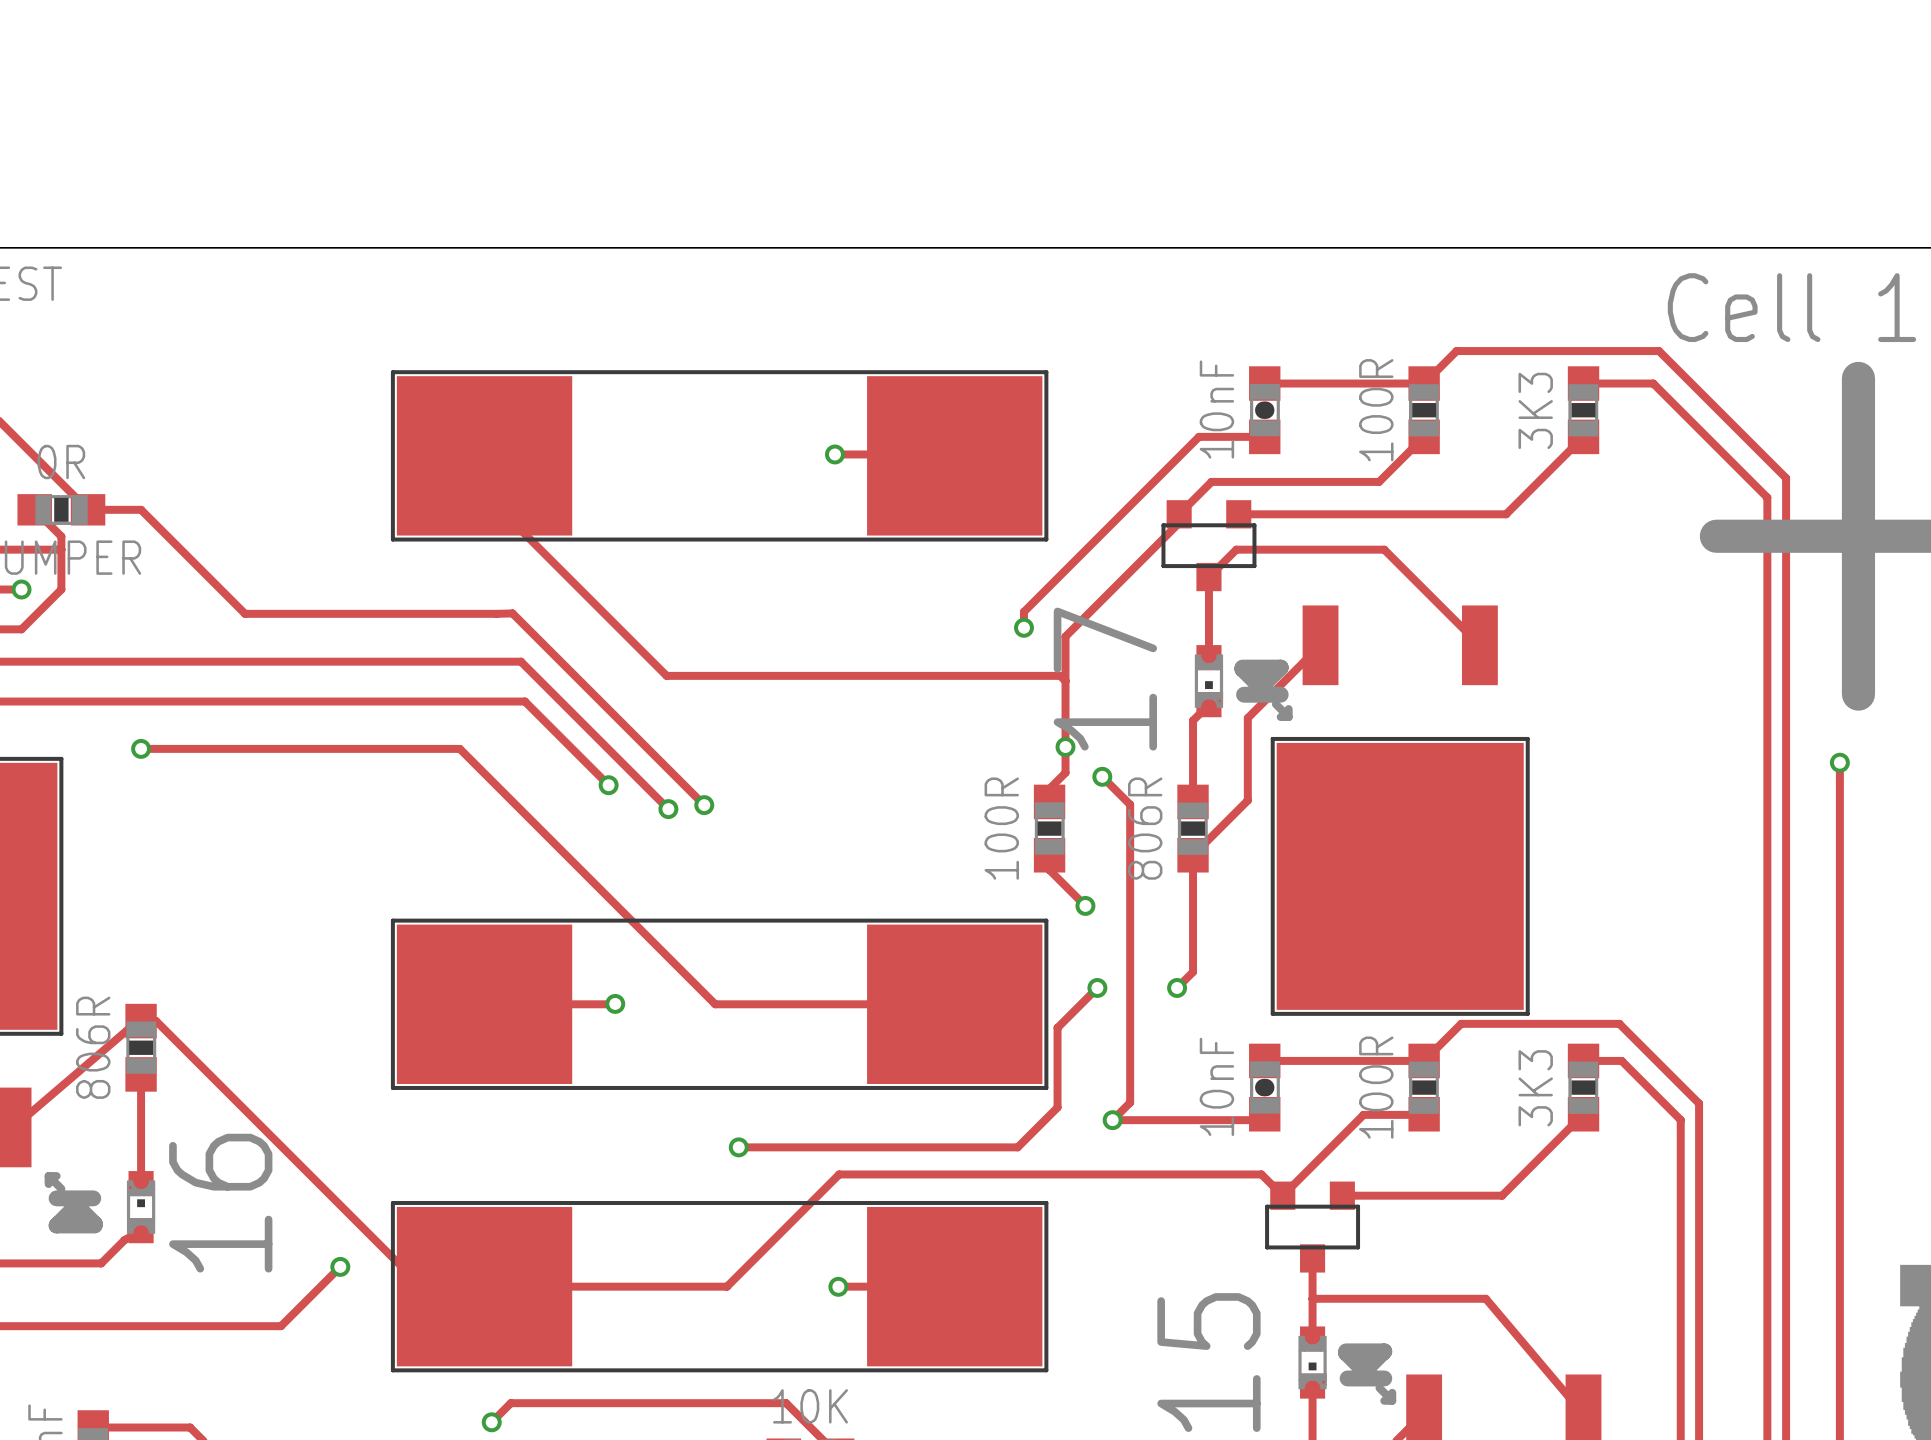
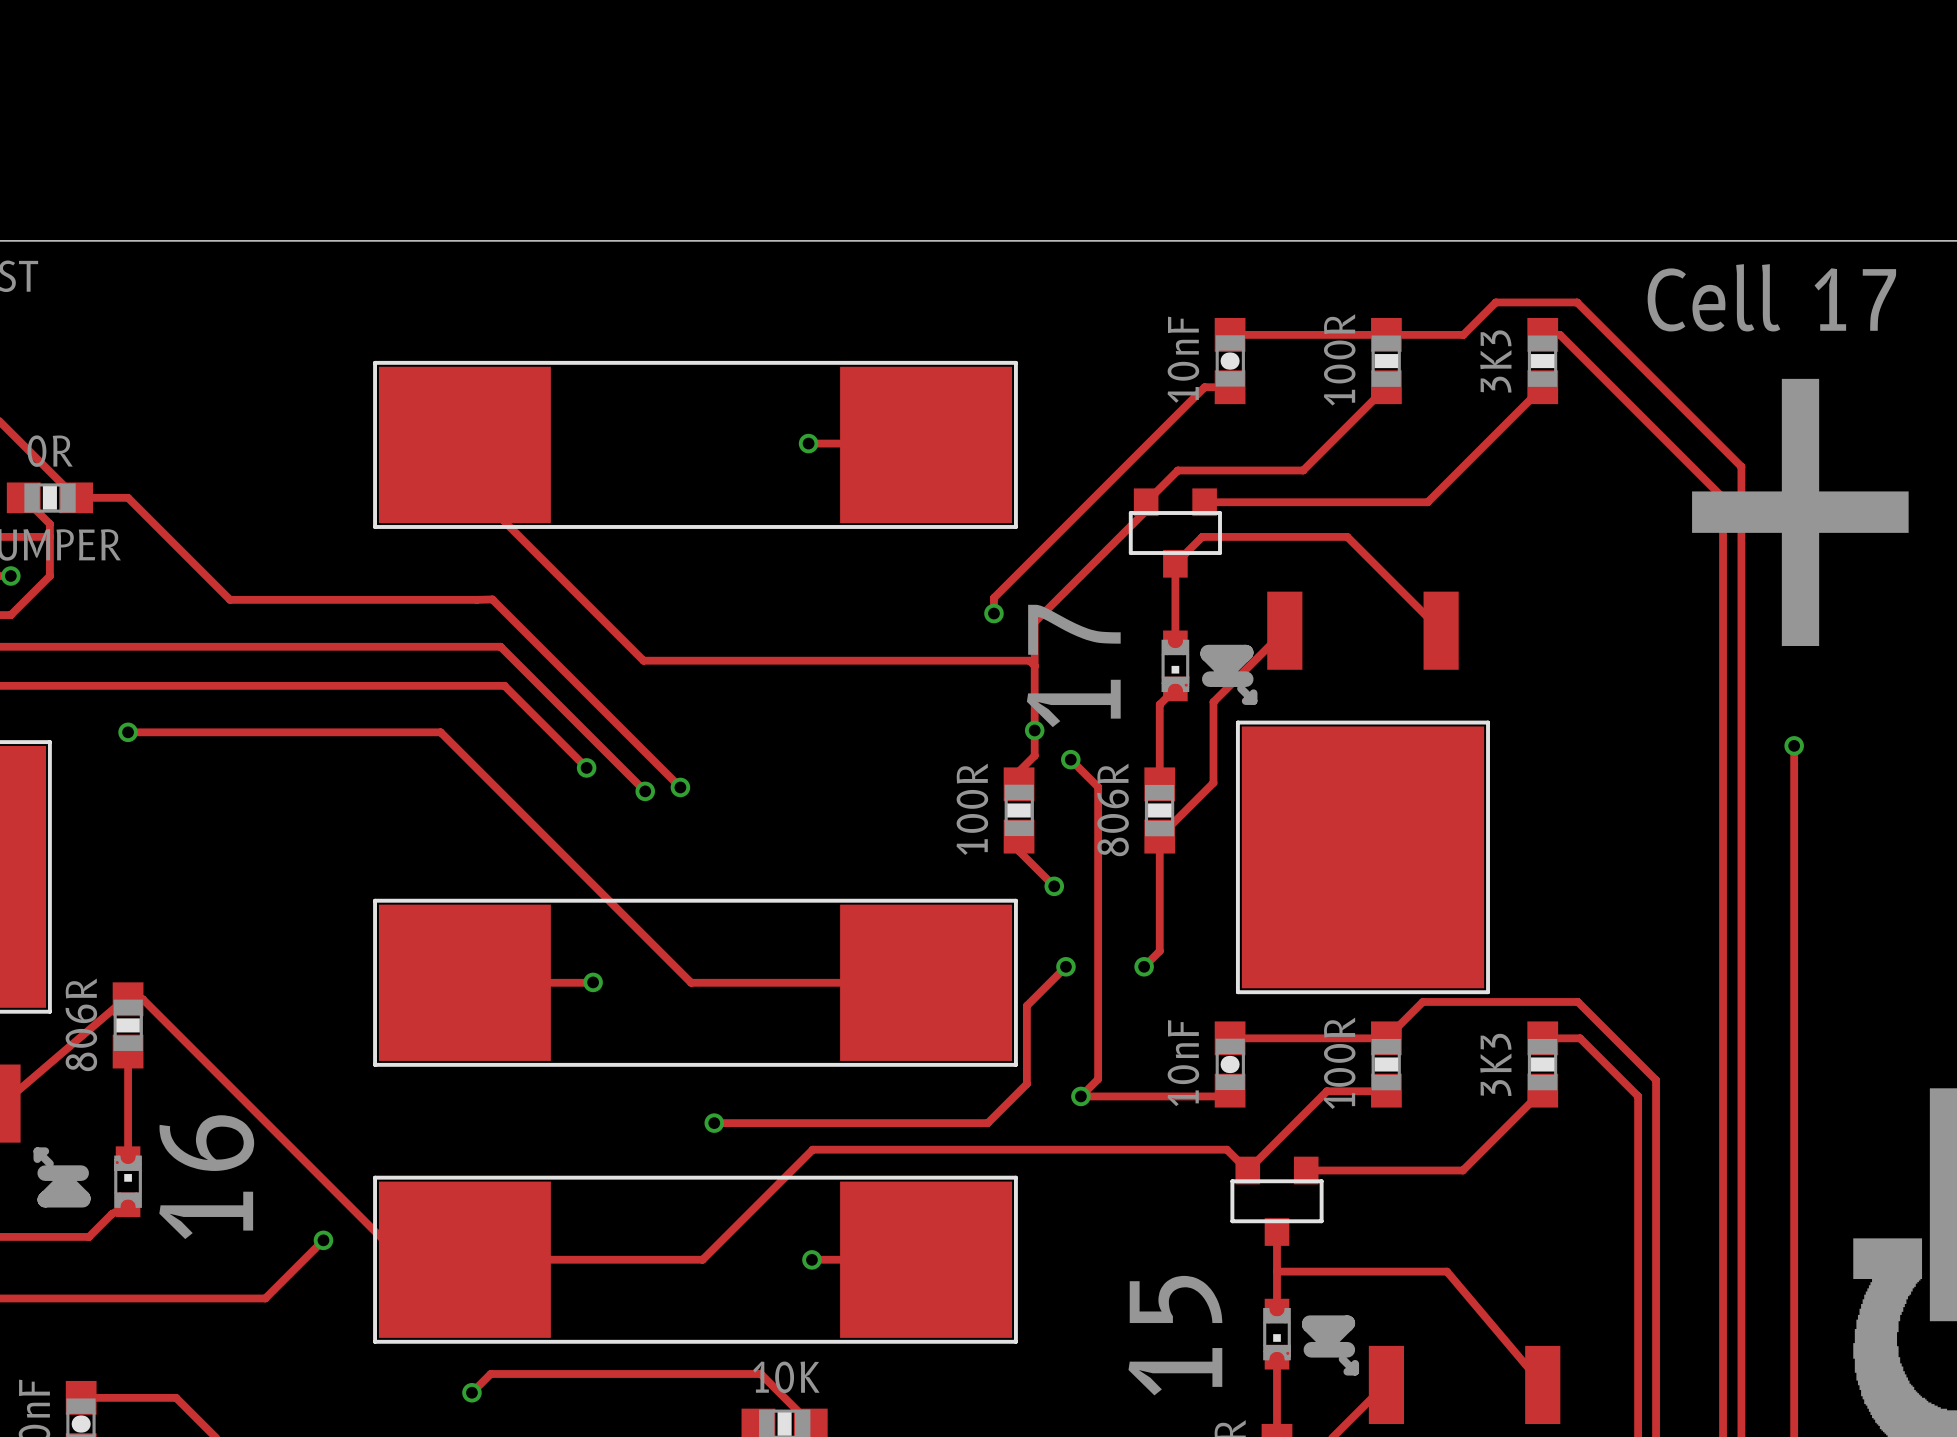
track: (1659, 351) (1456, 351) (1424, 383) (1264, 383) -> (1616, 342) (1577, 302) (1495, 302) (1463, 334) (1230, 334)
track: (1583, 383) (1653, 383) (1767, 497) (1767, 509) -> (1542, 334) (1560, 334) (1723, 497)
part position: (1264, 410) -> (1230, 361)
part position: (1424, 410) -> (1386, 361)
part position: (1583, 410) -> (1542, 361)
track: (1198, 436) (1264, 436) -> (1165, 426) (1204, 387) (1230, 387)
track: (1424, 436) (1379, 481) (1339, 481) -> (1386, 387) (1303, 470)
track: (1583, 436) (1506, 514) (1466, 514) -> (1542, 387) (1427, 502)

